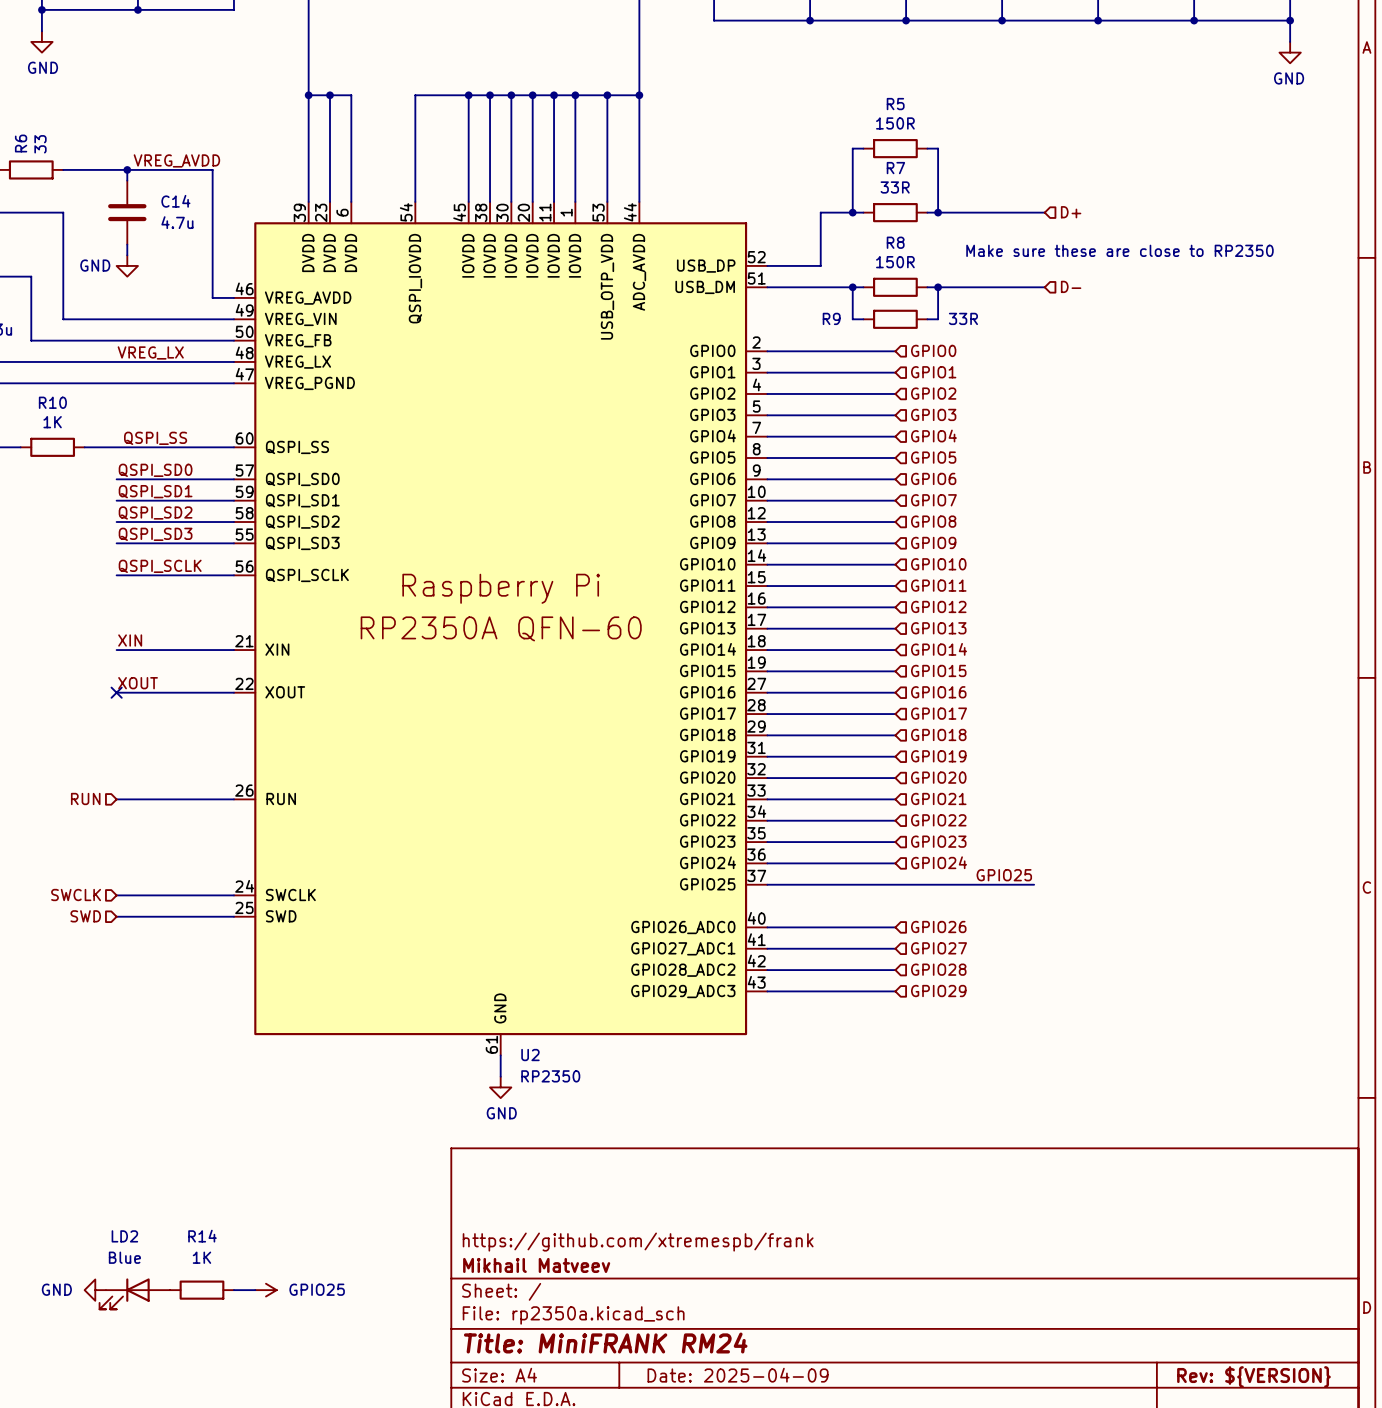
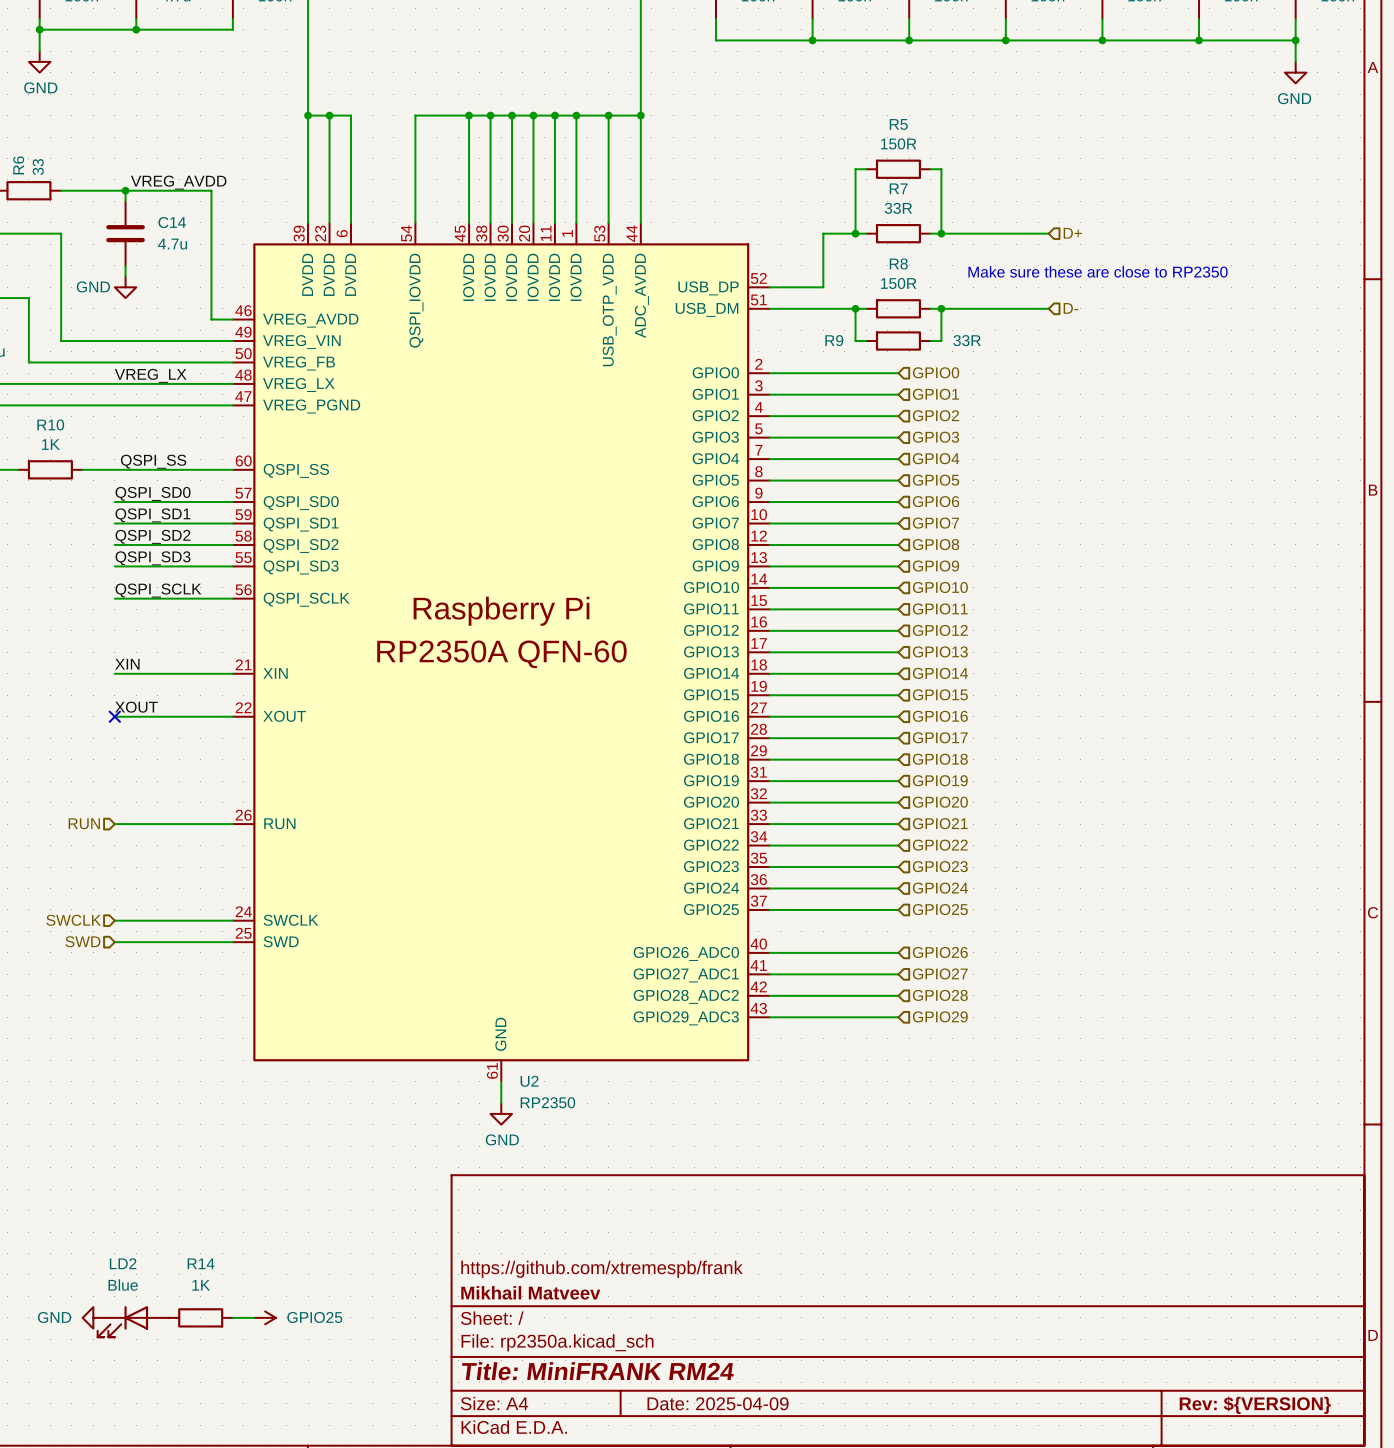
label: GPIO25 (1004, 875) -> none
wire: (895, 884) (1034, 884) -> none
hierarchical label: none -> GPIO25 (940, 909)

